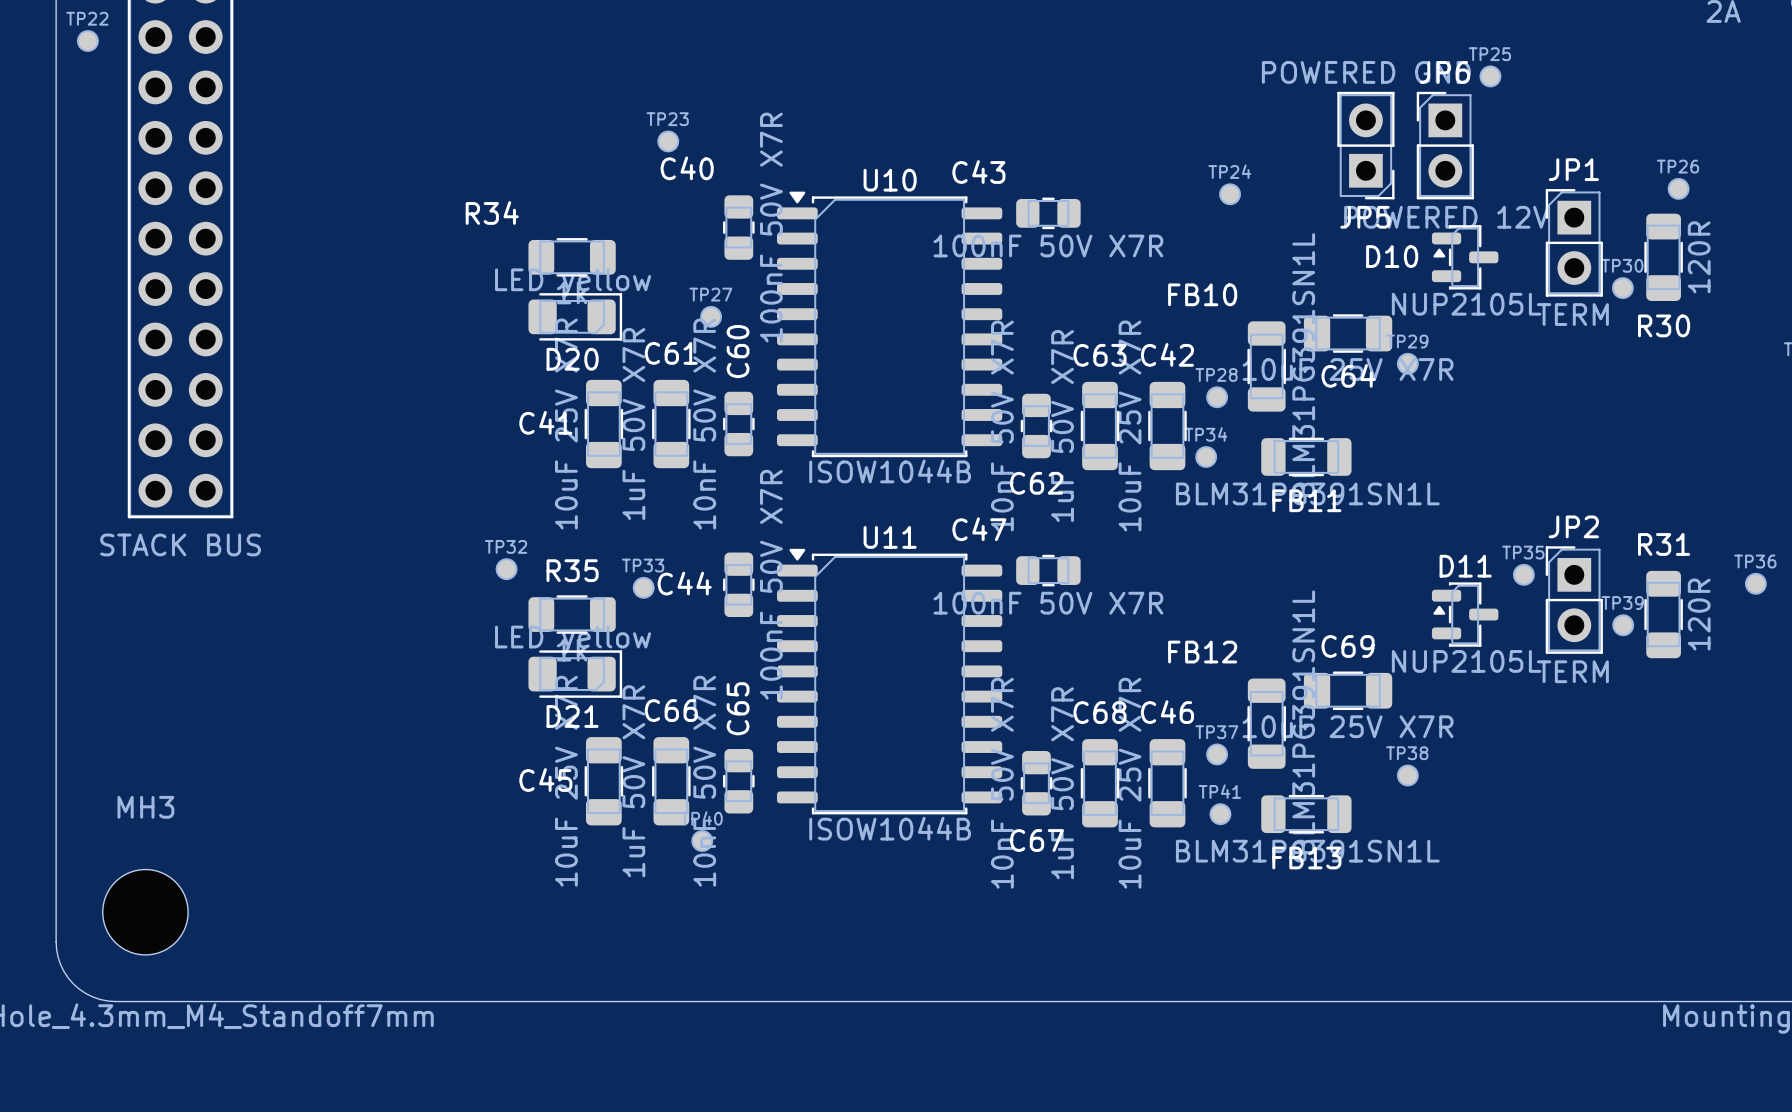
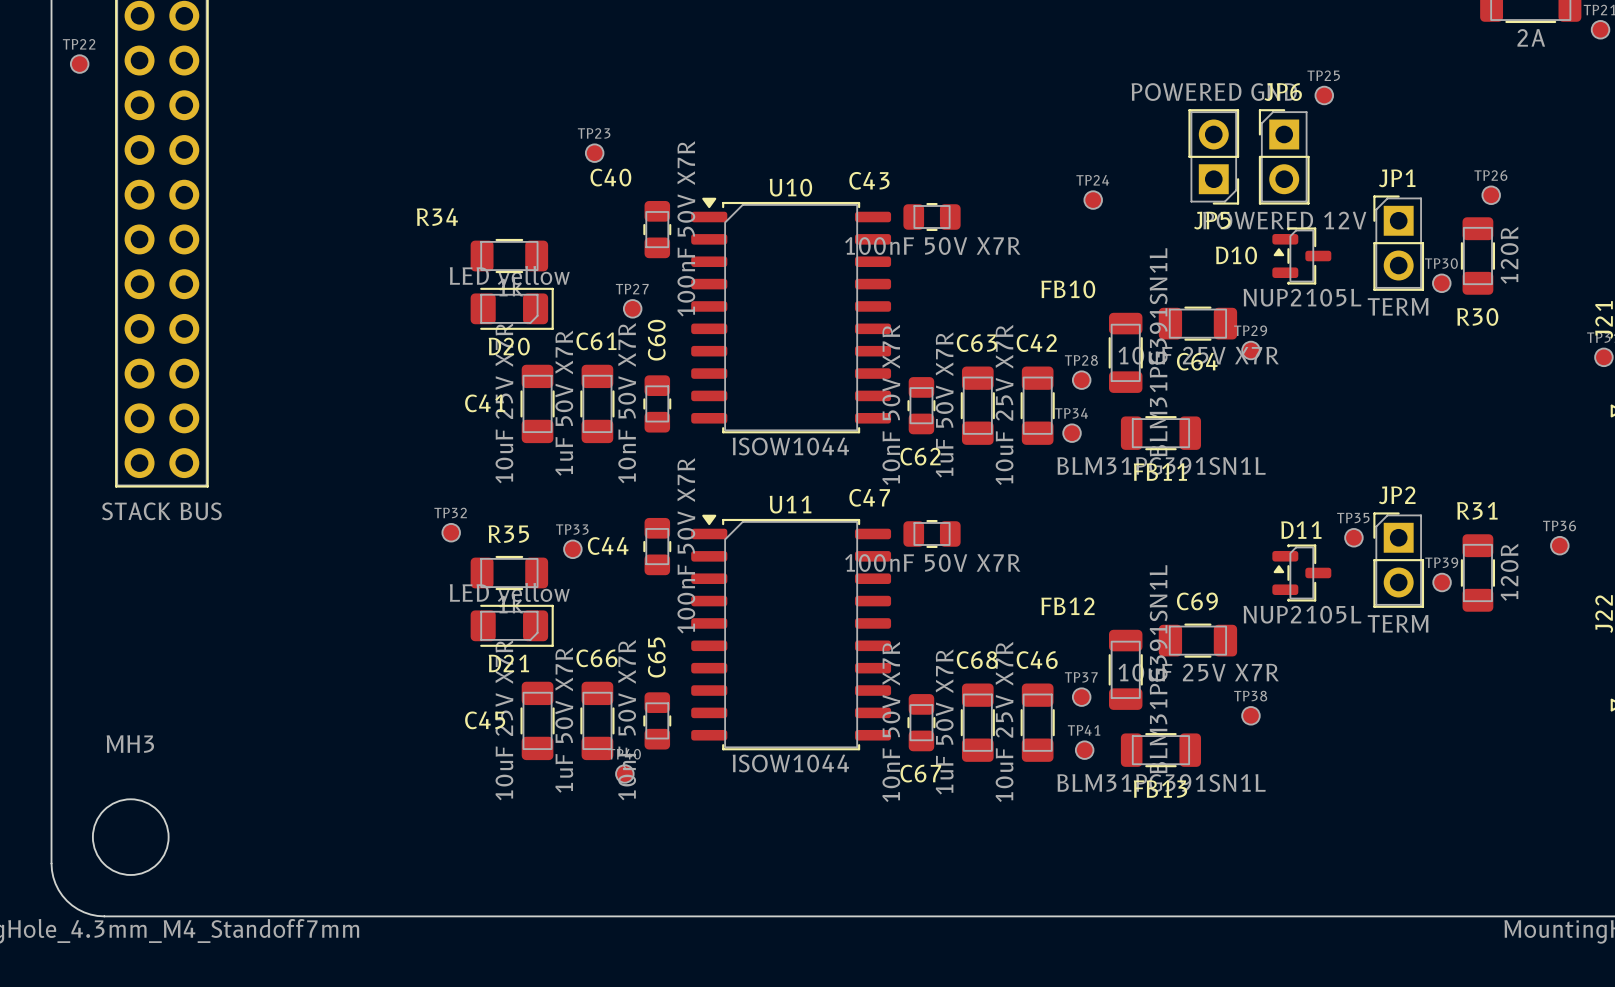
U10 value: ISOW1044B (890, 471) -> ISOW1044 (790, 446)
U11 value: ISOW1044B (890, 828) -> ISOW1044 (790, 763)

